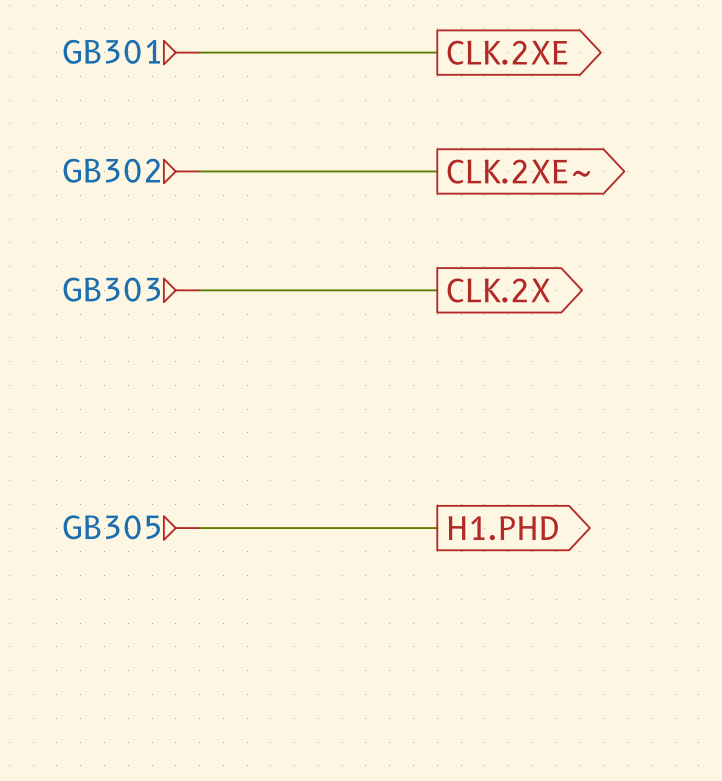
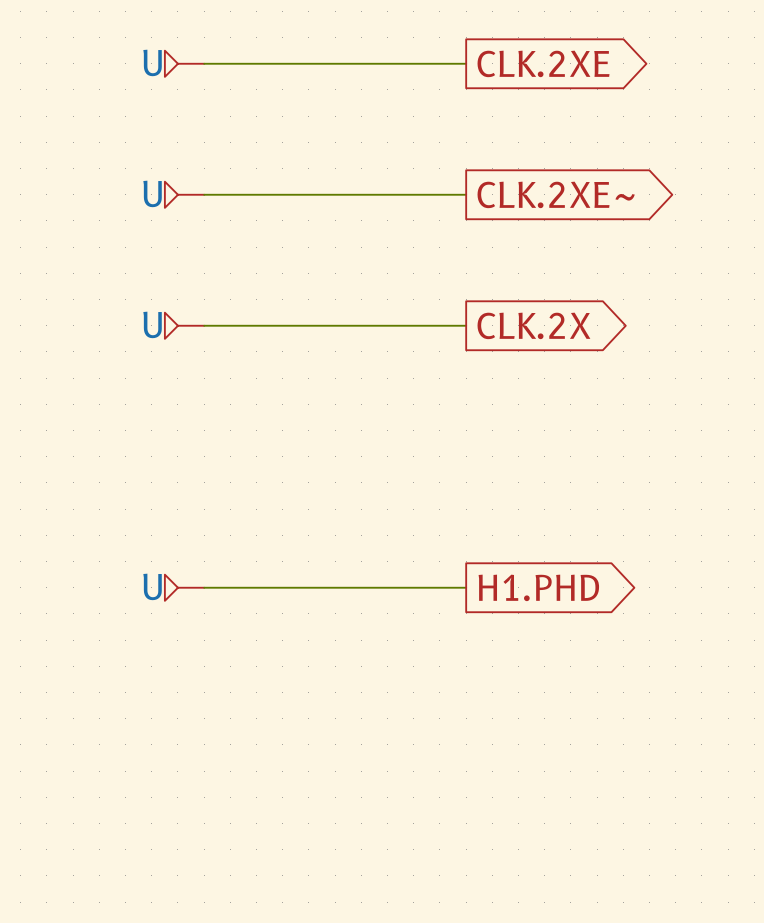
GB301 name: GB301 (111, 51) -> U (152, 62)
GB302 name: GB302 (111, 170) -> U (152, 193)
GB303 name: GB303 (111, 289) -> U (152, 324)
GB305 name: GB305 (111, 527) -> U (152, 586)

